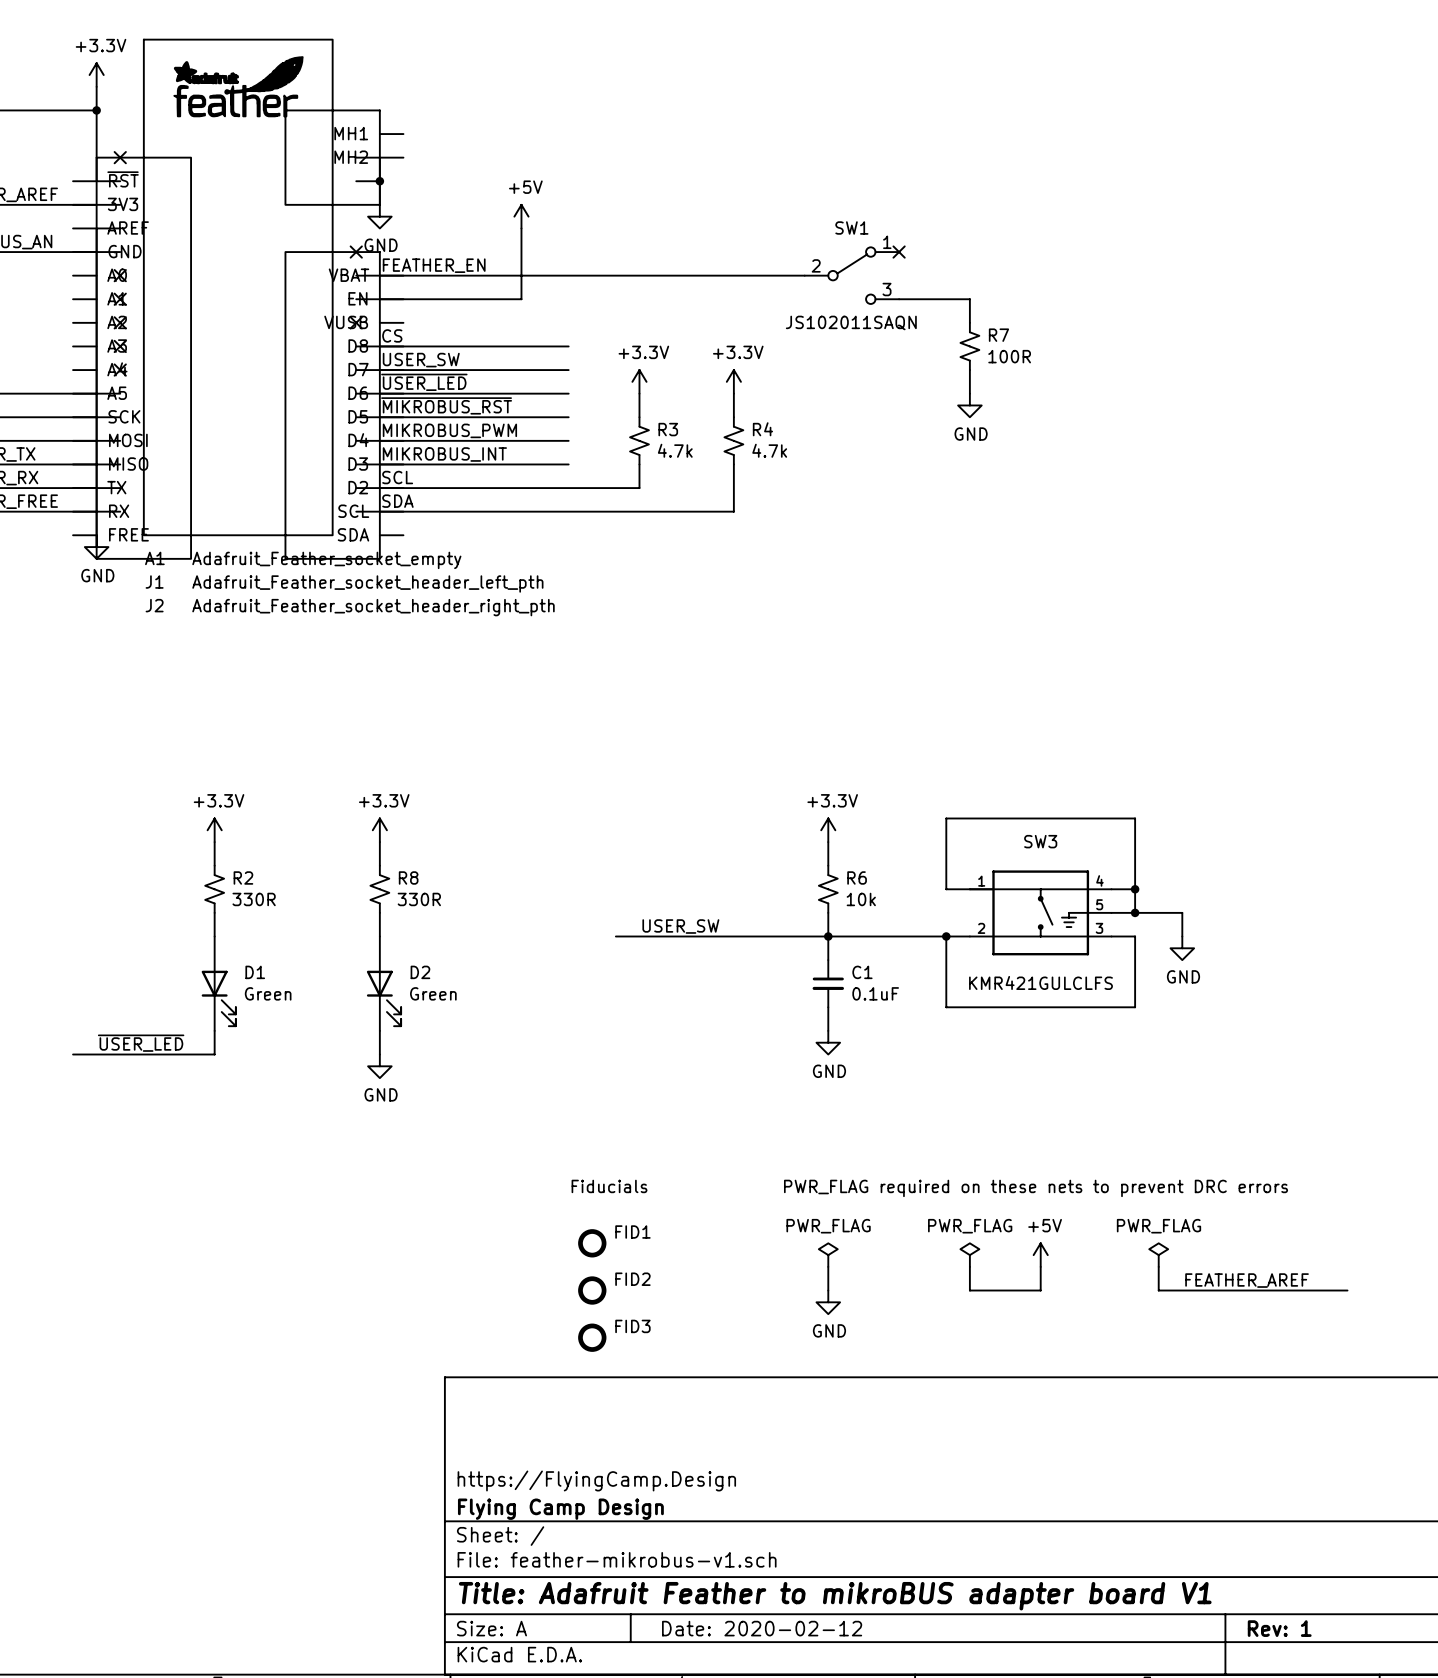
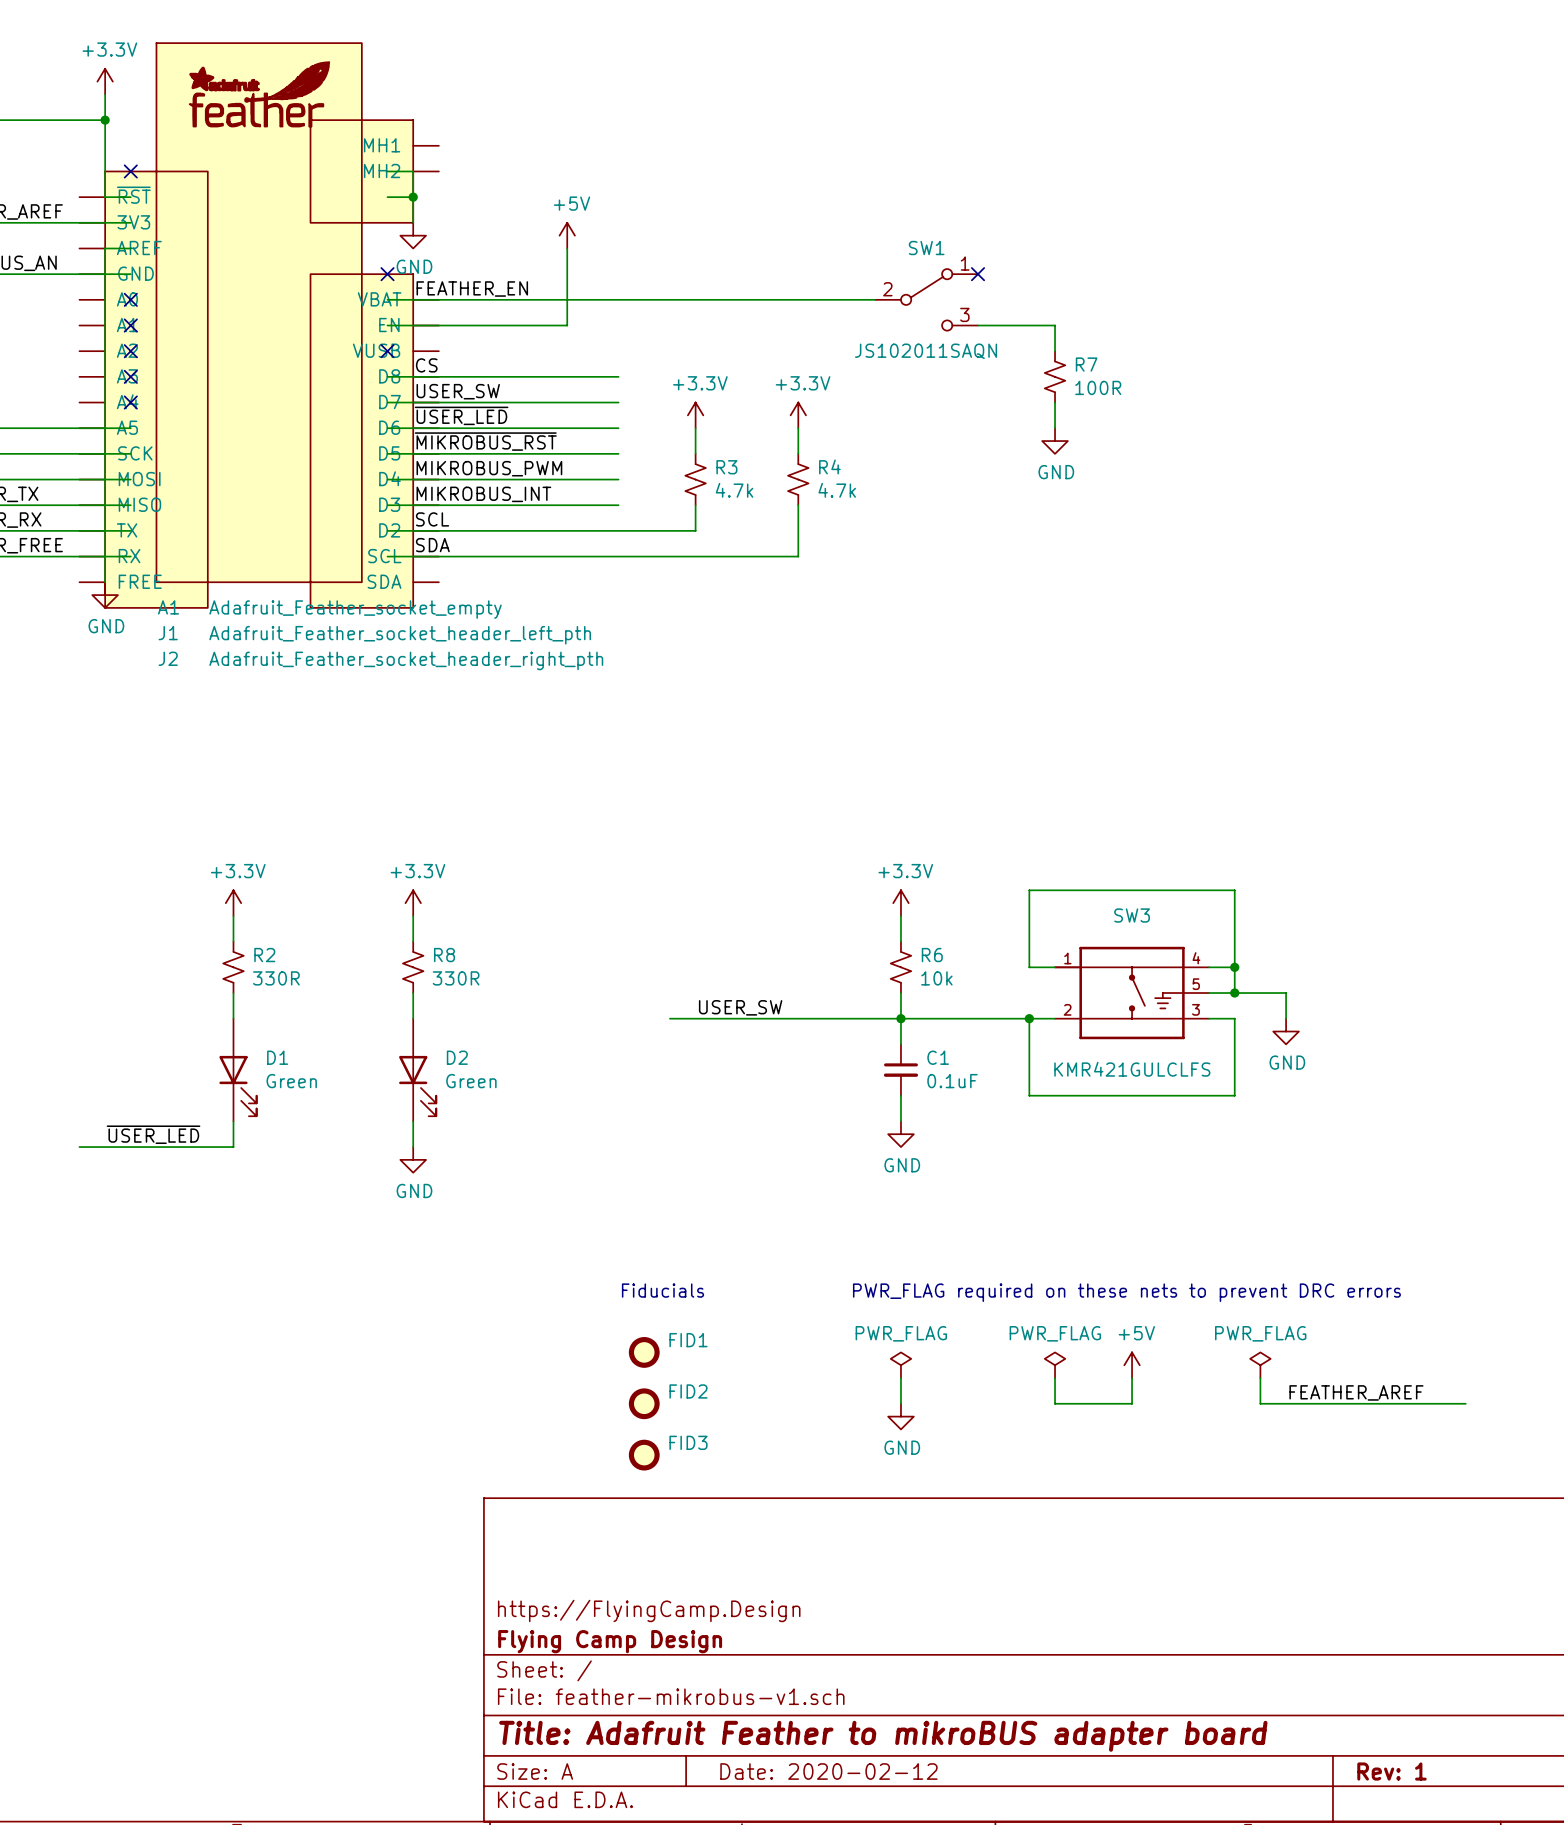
title block: Title: Adafruit Feather to mikroBUS adapter board V1 (835, 1596) -> Title: Adafruit Feather to mikroBUS adapter board (883, 1736)

